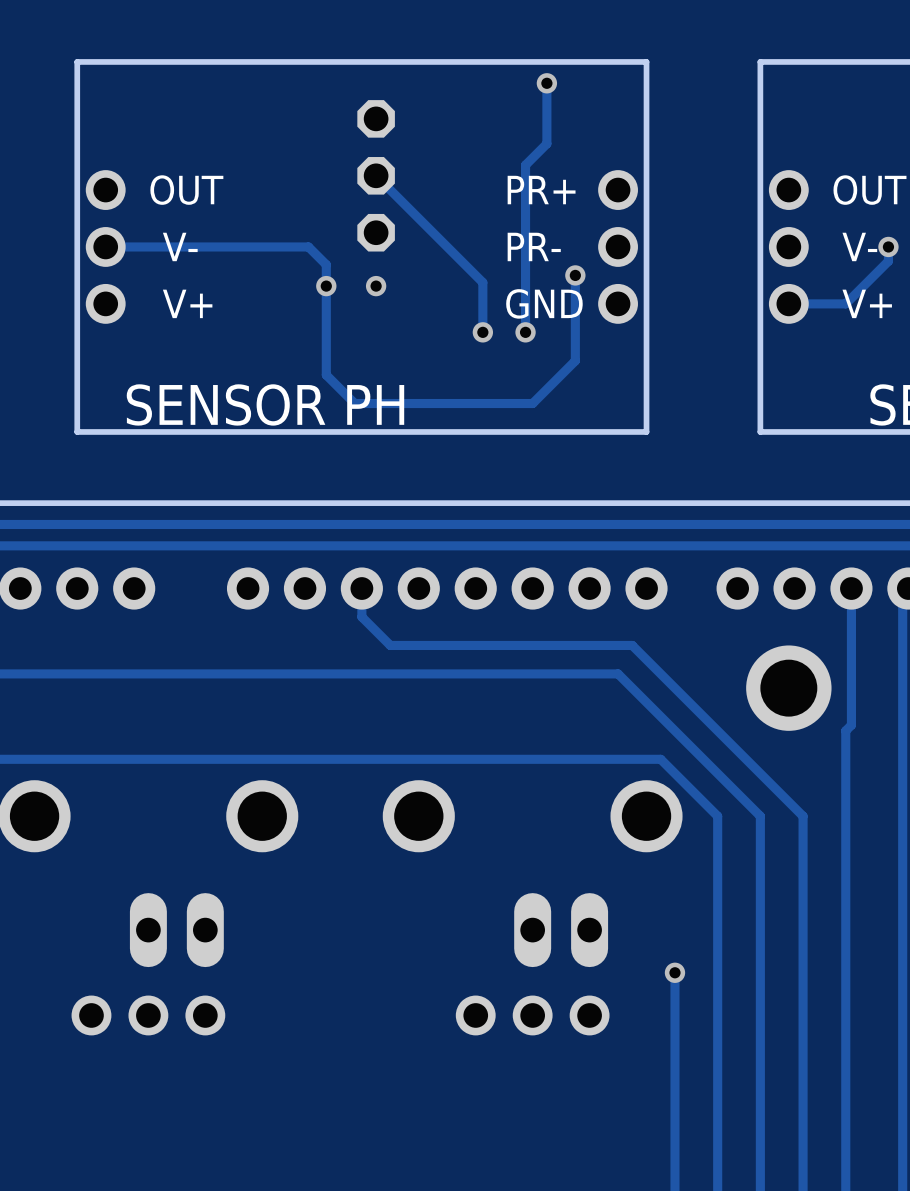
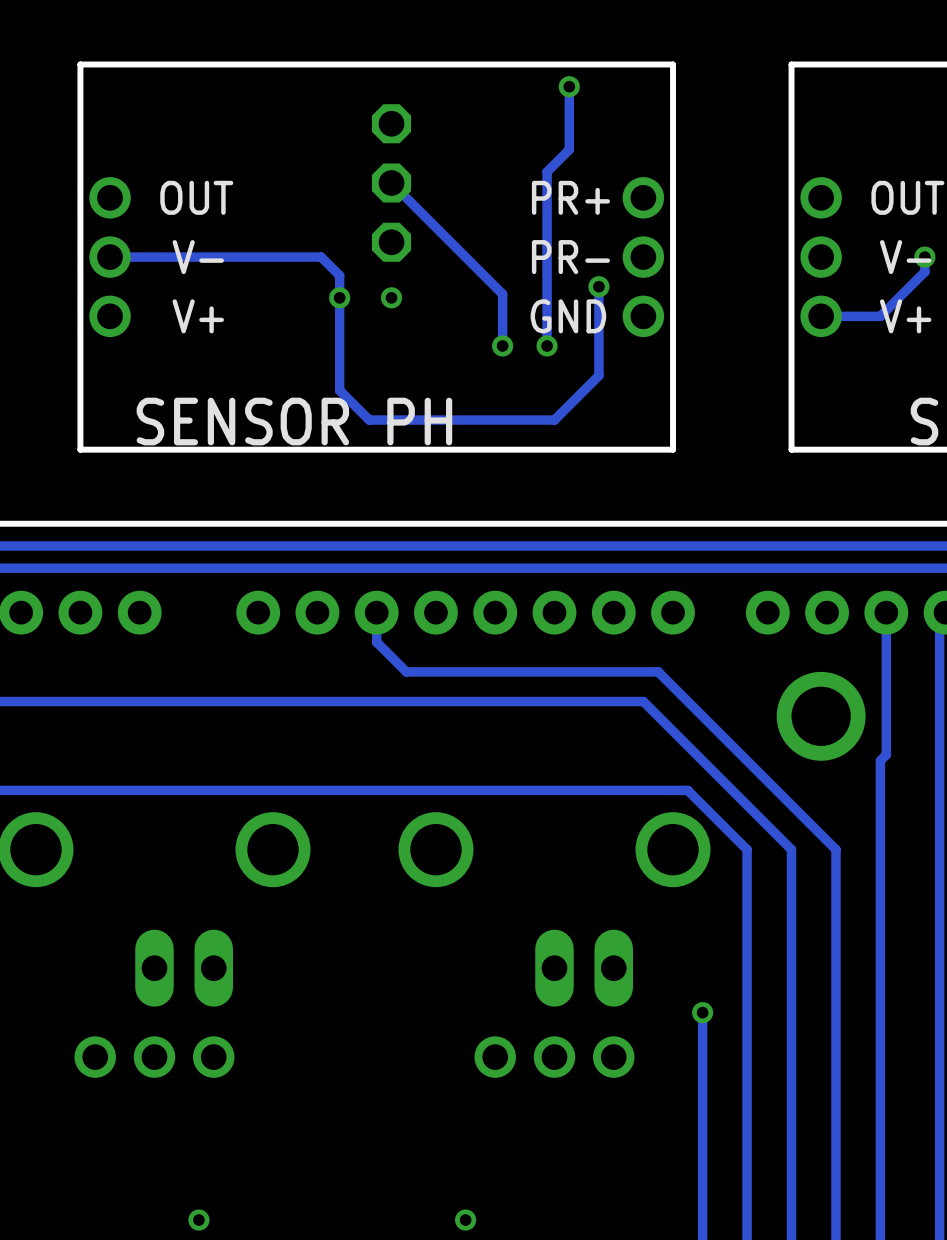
via: none -> (198, 1220)
via: none -> (465, 1220)

